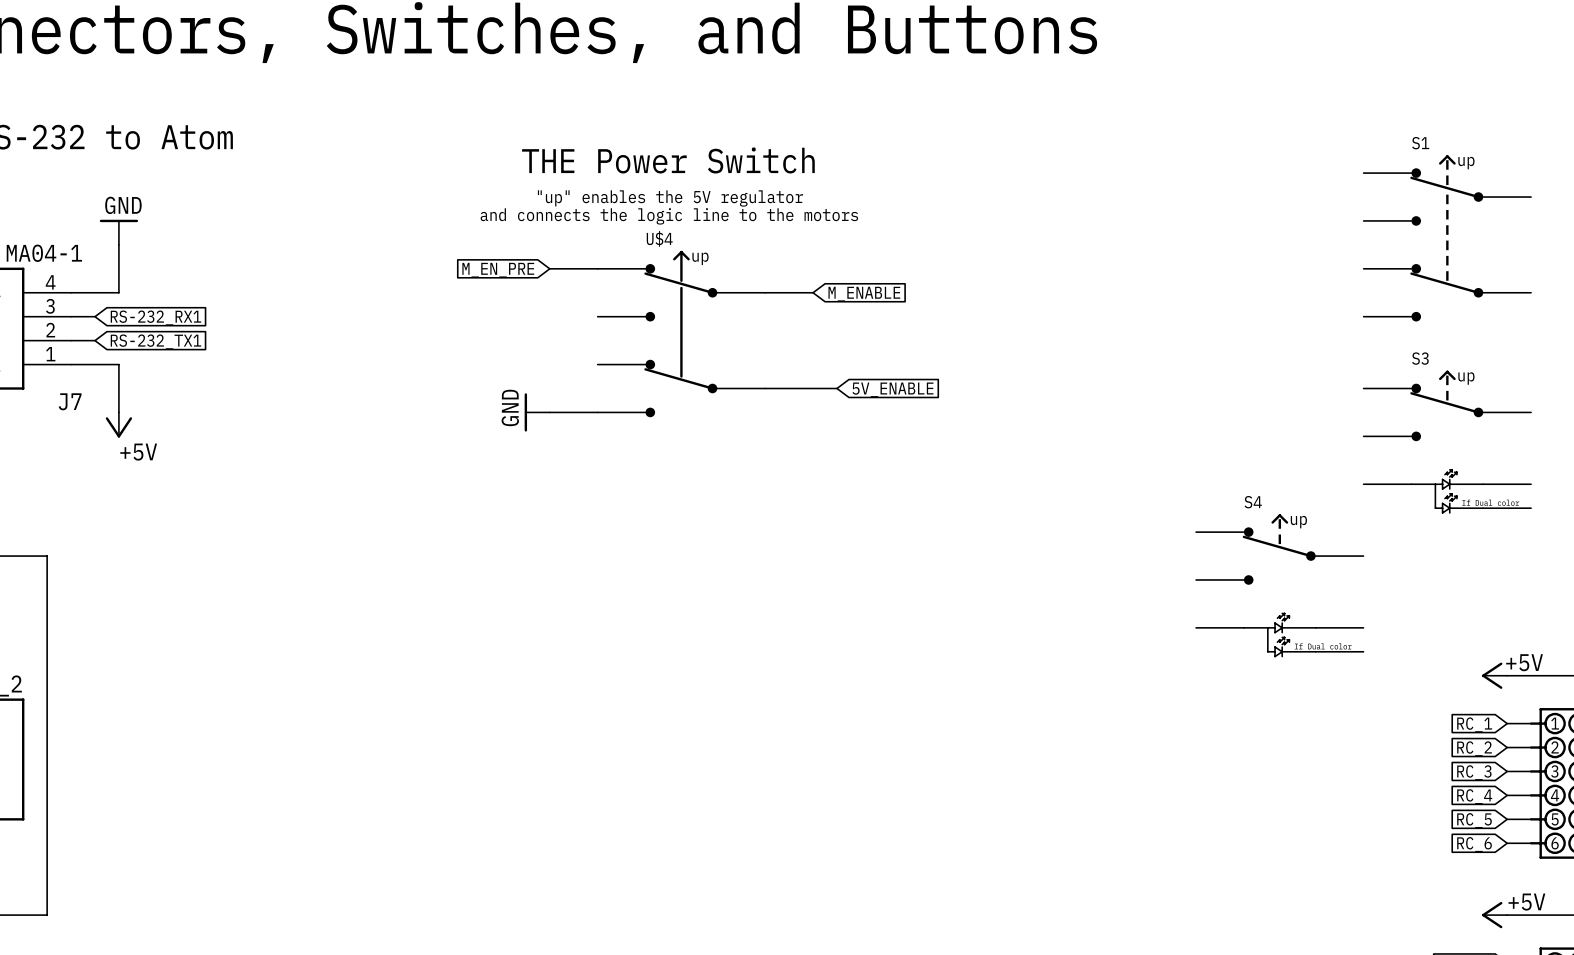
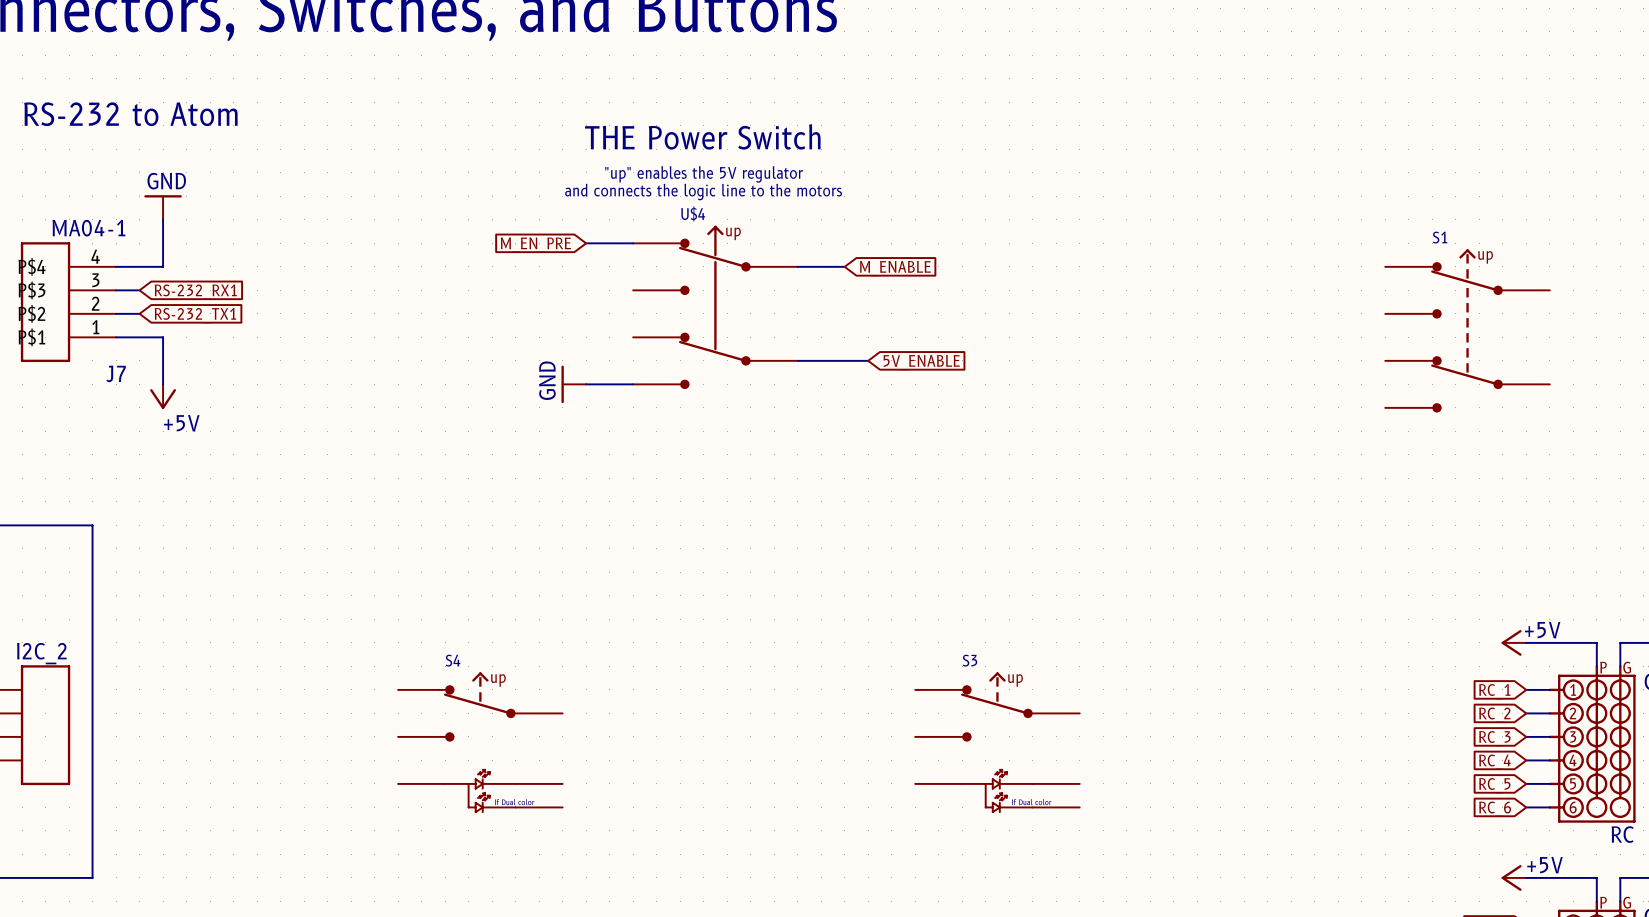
S1 position: (1447, 238) -> (1467, 330)
S3 position: (1447, 441) -> (997, 742)
S4 position: (1279, 585) -> (480, 742)

